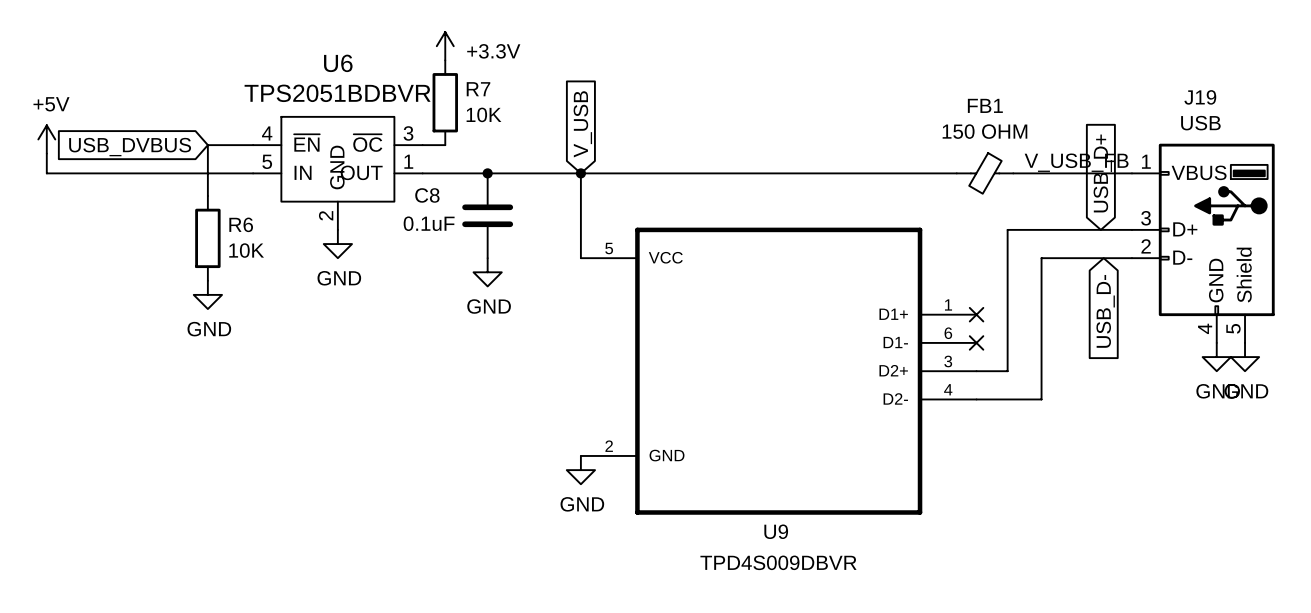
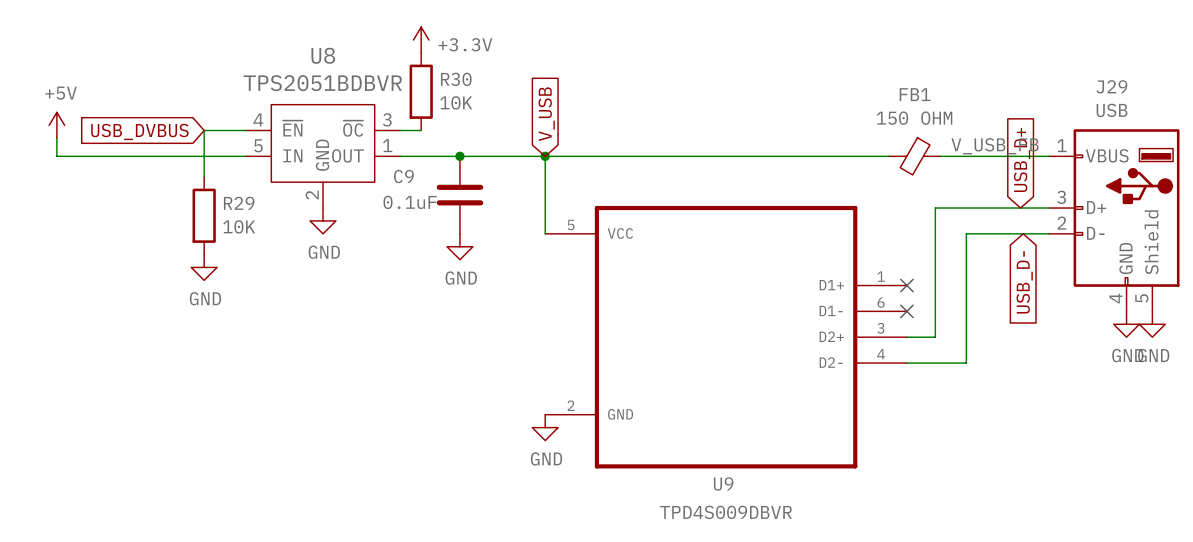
U6 name: U6 (338, 63) -> U8 (323, 55)
R7 name: R7 (478, 89) -> R30 (456, 79)
J19 name: J19 (1200, 97) -> J29 (1111, 86)
C8 name: C8 (427, 195) -> C9 (403, 176)
R6 name: R6 (241, 224) -> R29 (239, 203)

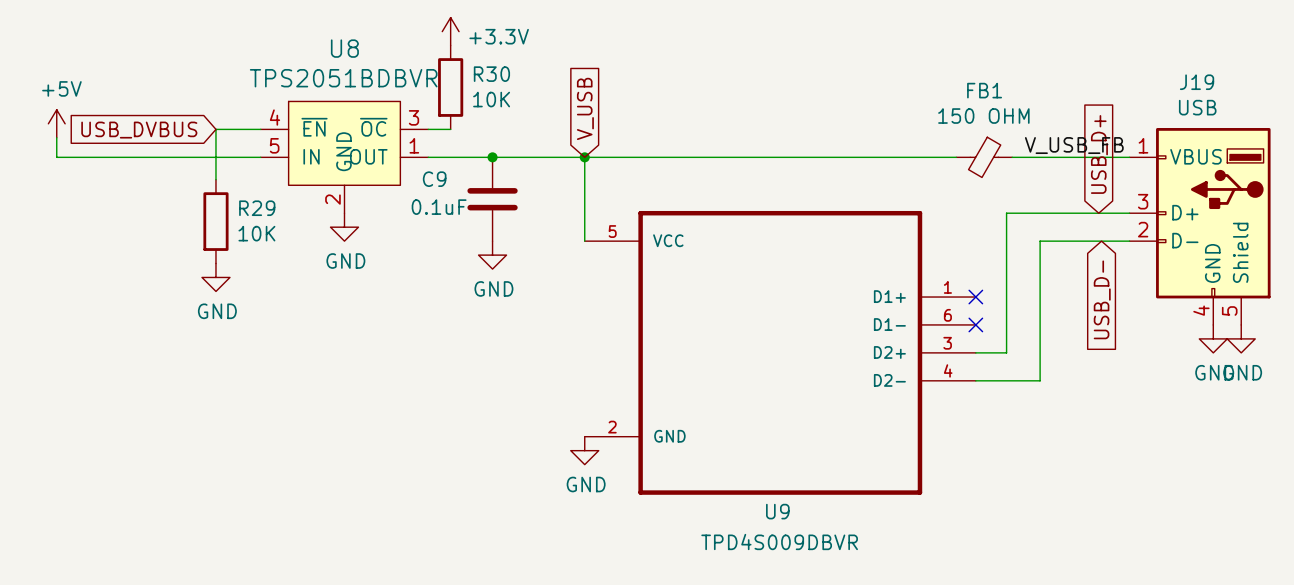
J29 name: J29 (1111, 86) -> J19 (1197, 82)

